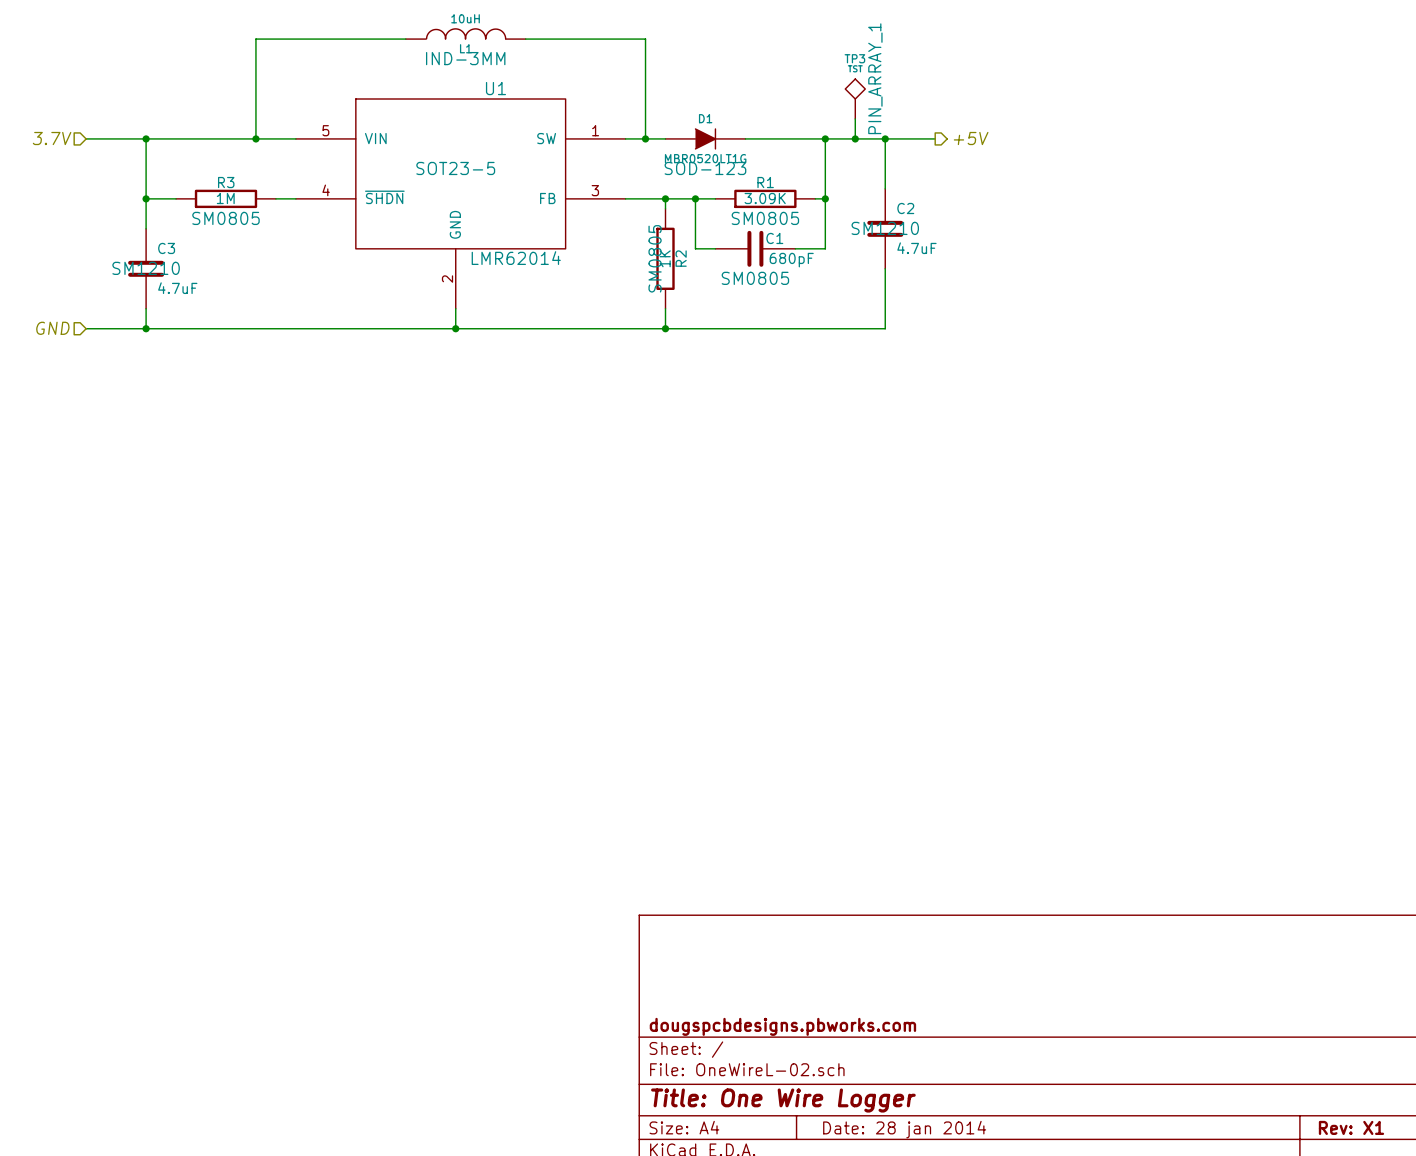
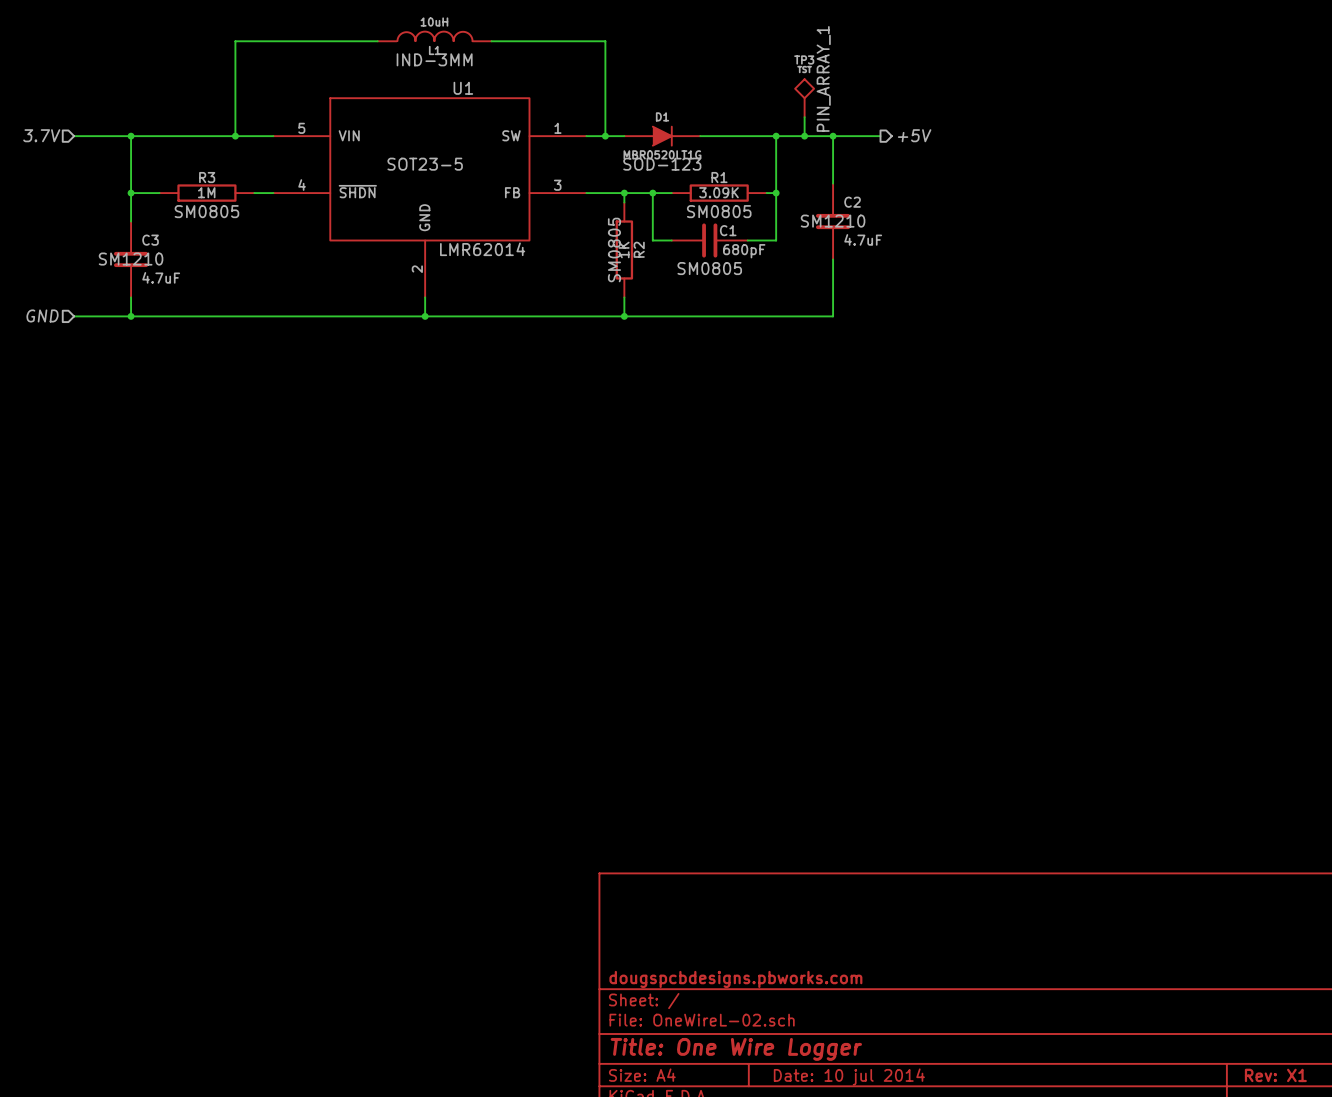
title block: Date: 28 jan 2014 (904, 1129) -> Date: 10 jul 2014 (849, 1077)

